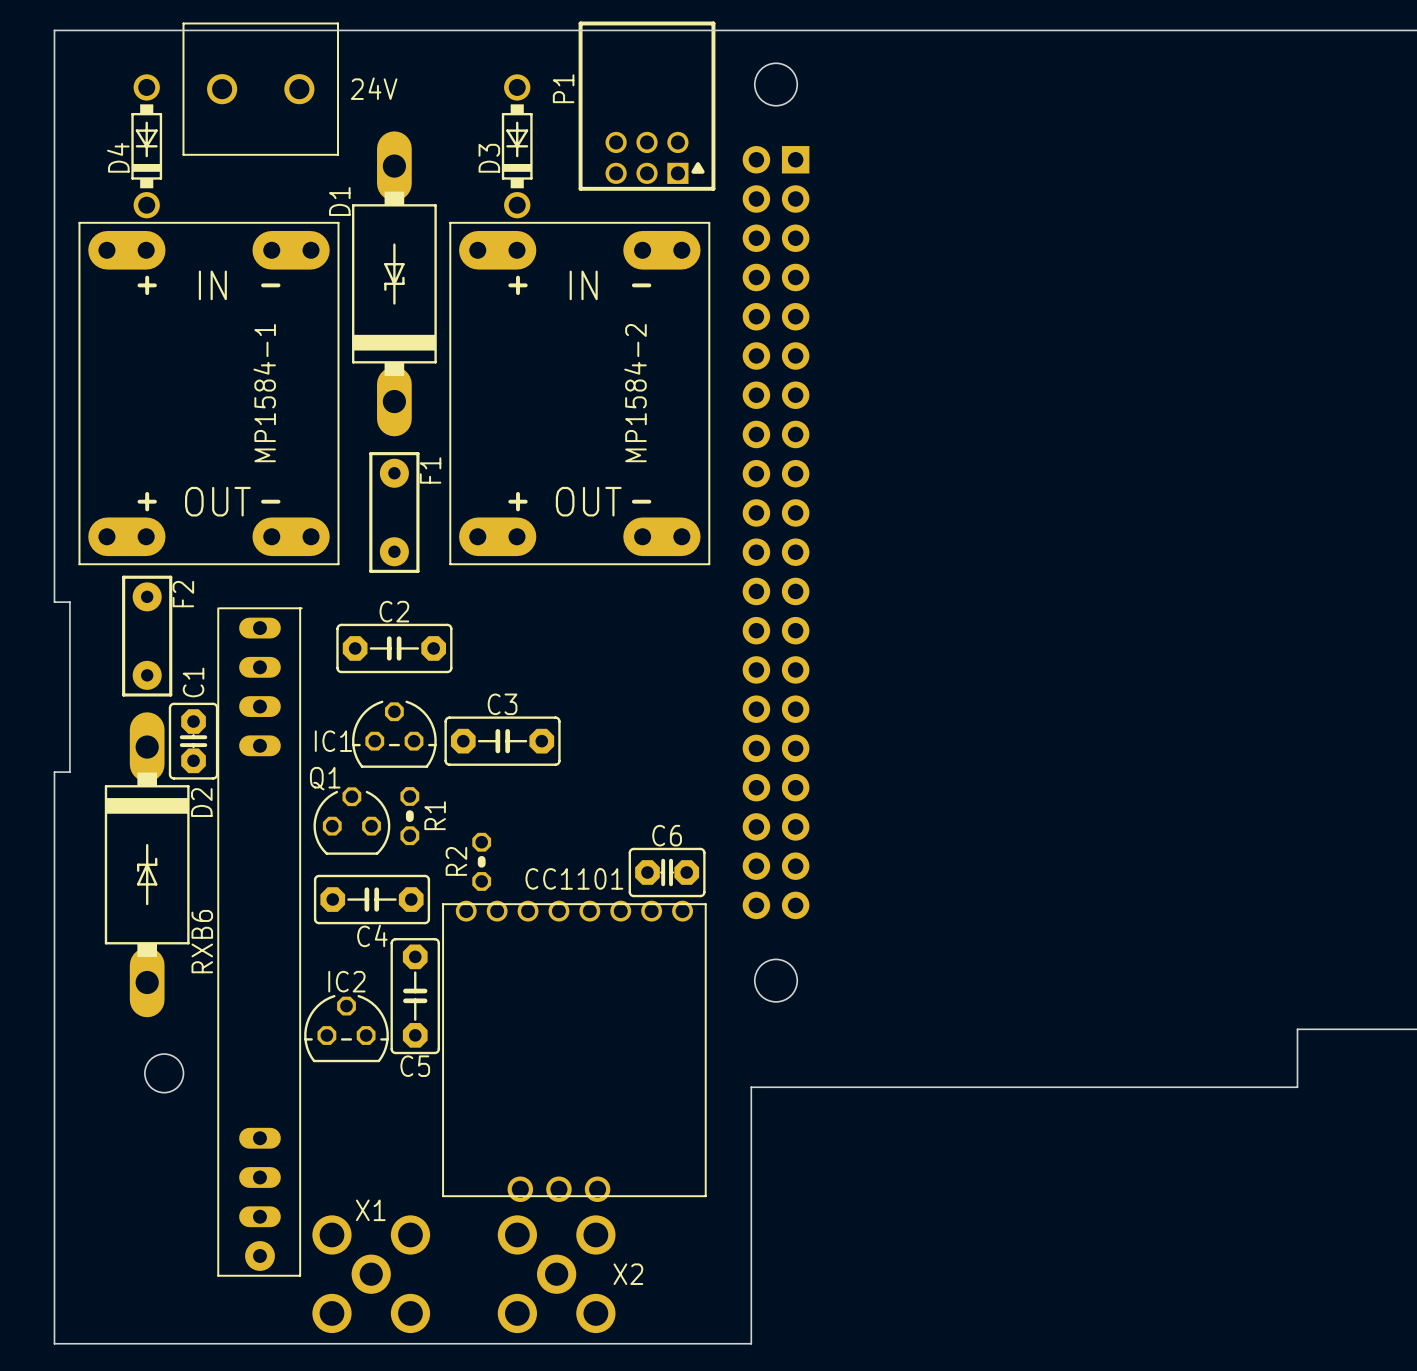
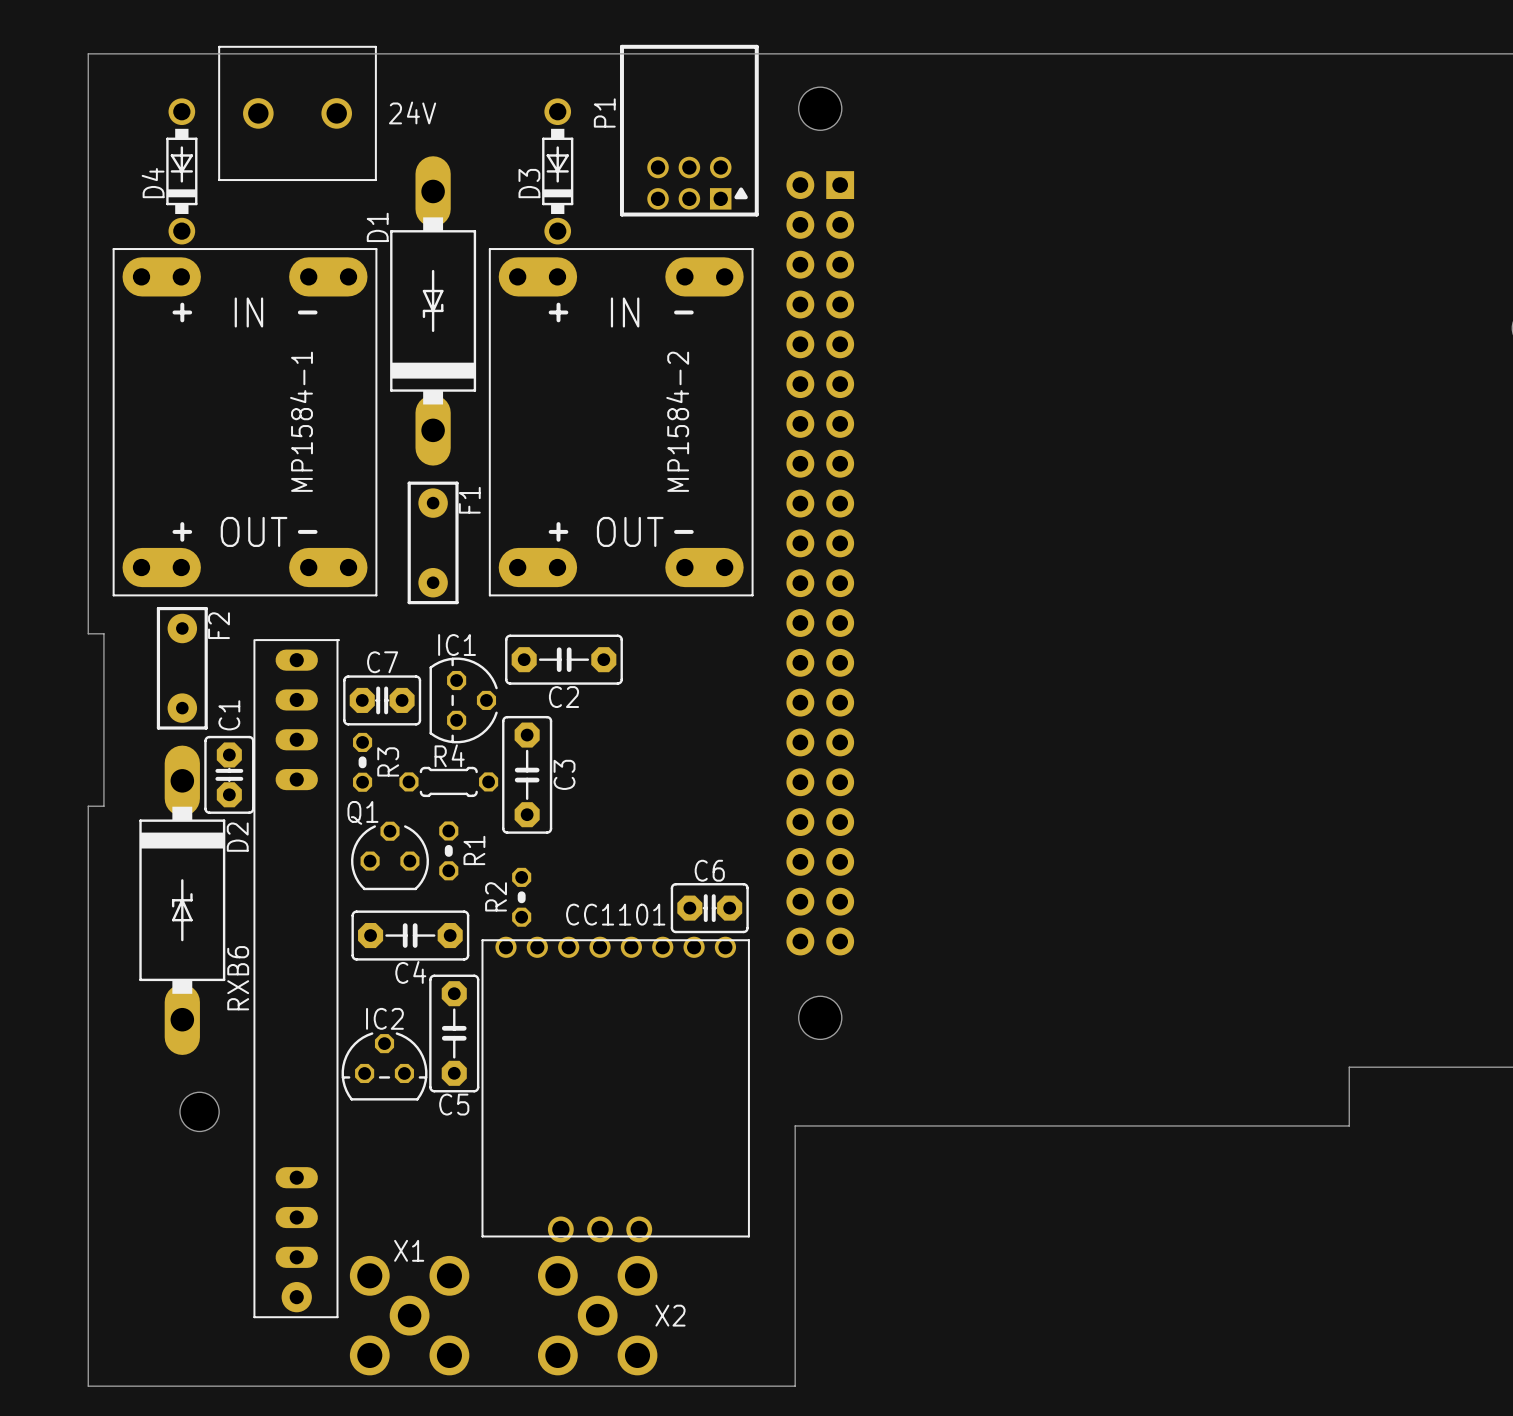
C2 rotation: 0° (394, 648) -> 180° (563, 659)
C2 position: (394, 648) -> (563, 659)
C7: none -> (382, 700)
R3: none -> (362, 762)
IC1 rotation: 0° (394, 734) -> 90° clockwise (463, 700)
IC1 position: (394, 734) -> (463, 700)
C3 rotation: 0° (502, 741) -> 90° clockwise (527, 774)
R4: none -> (448, 781)

